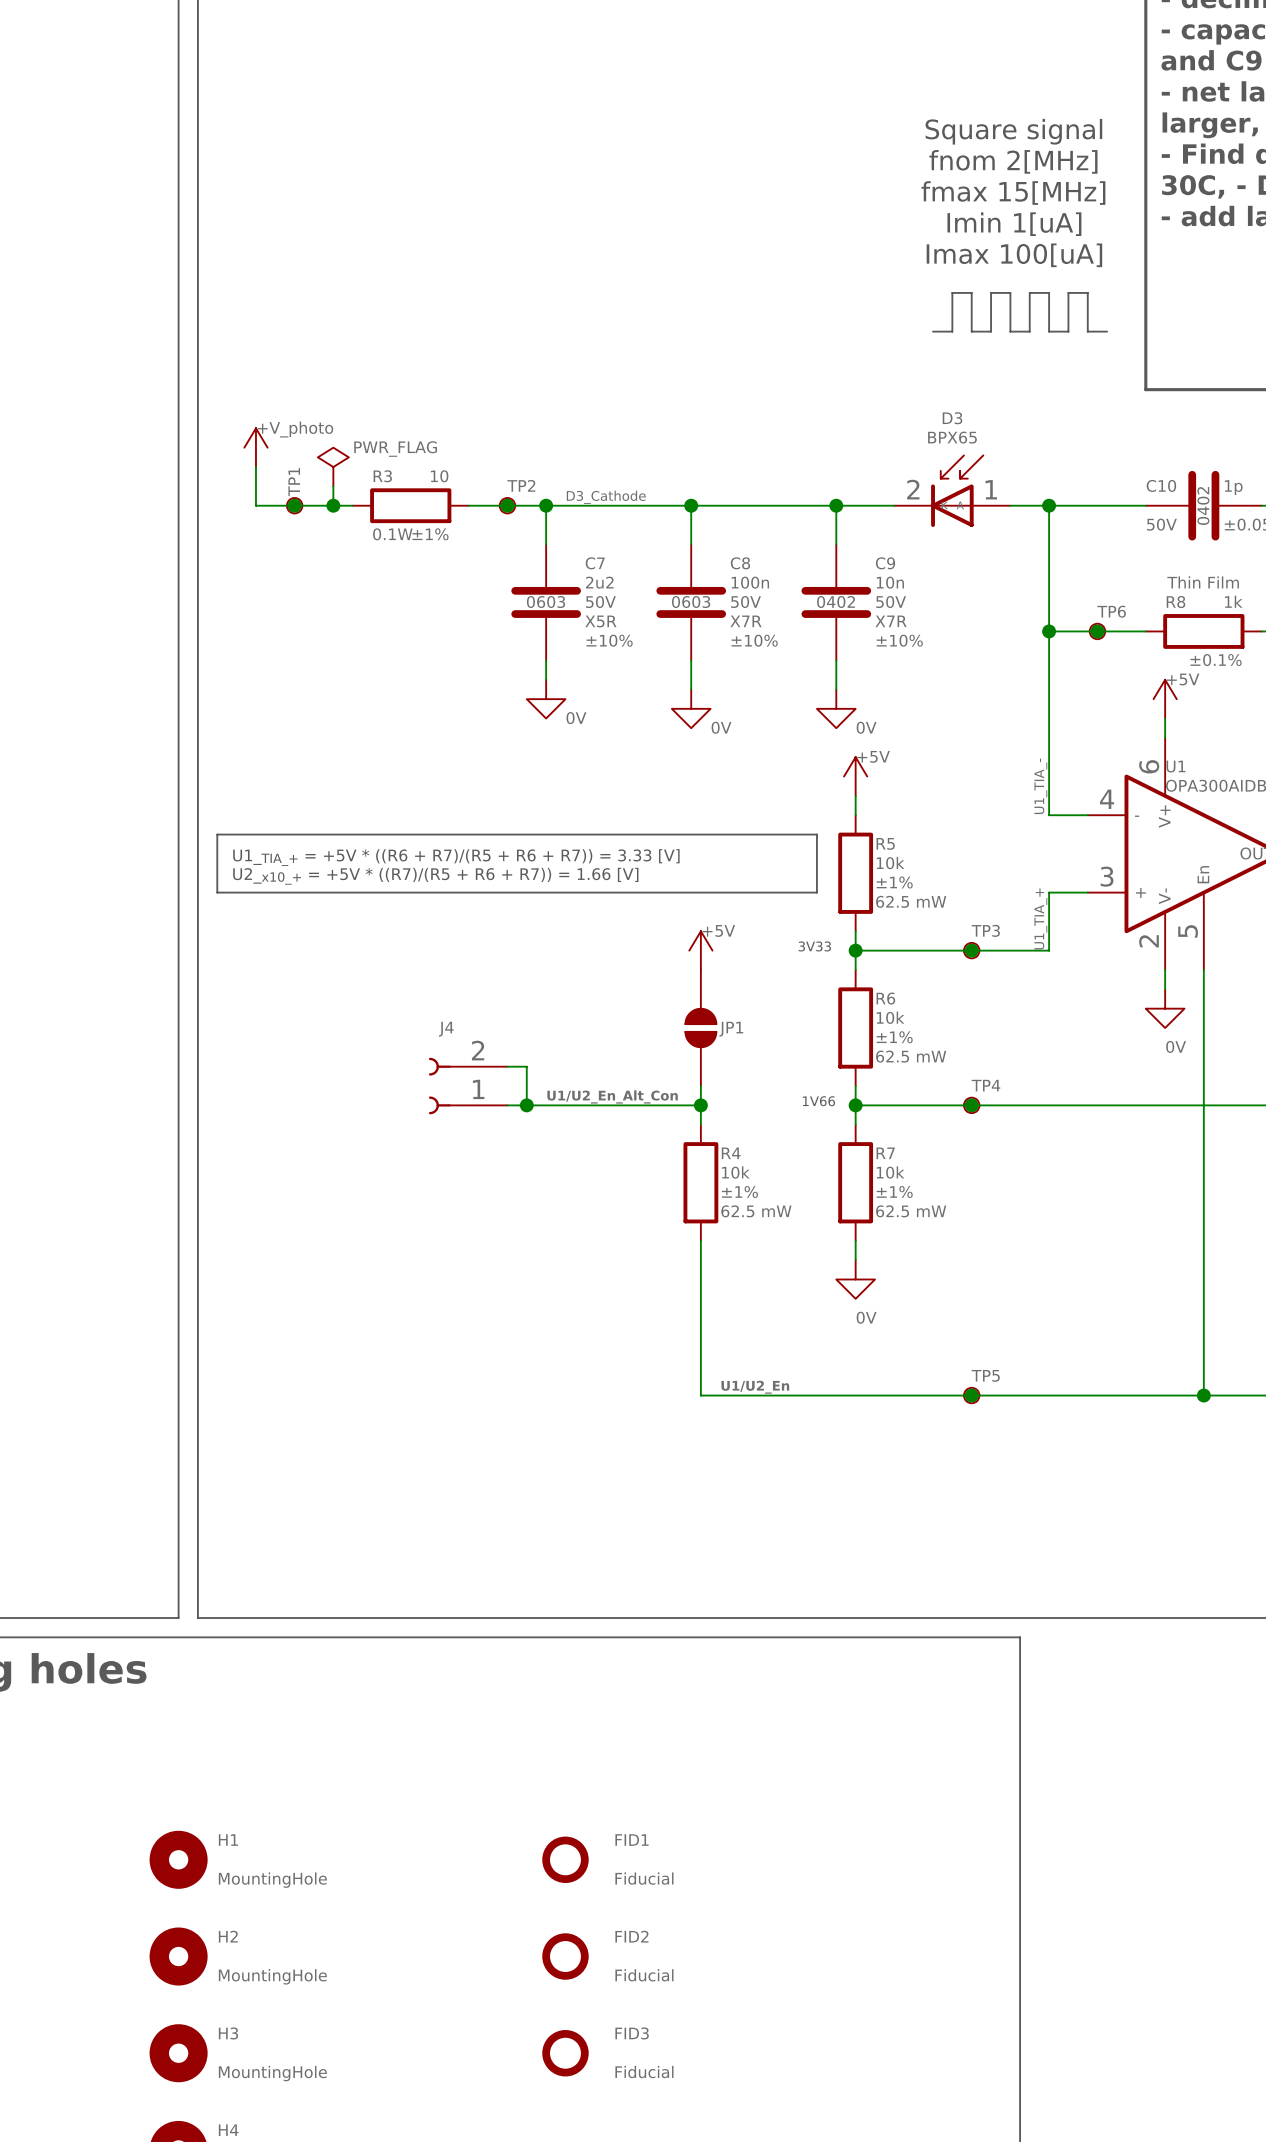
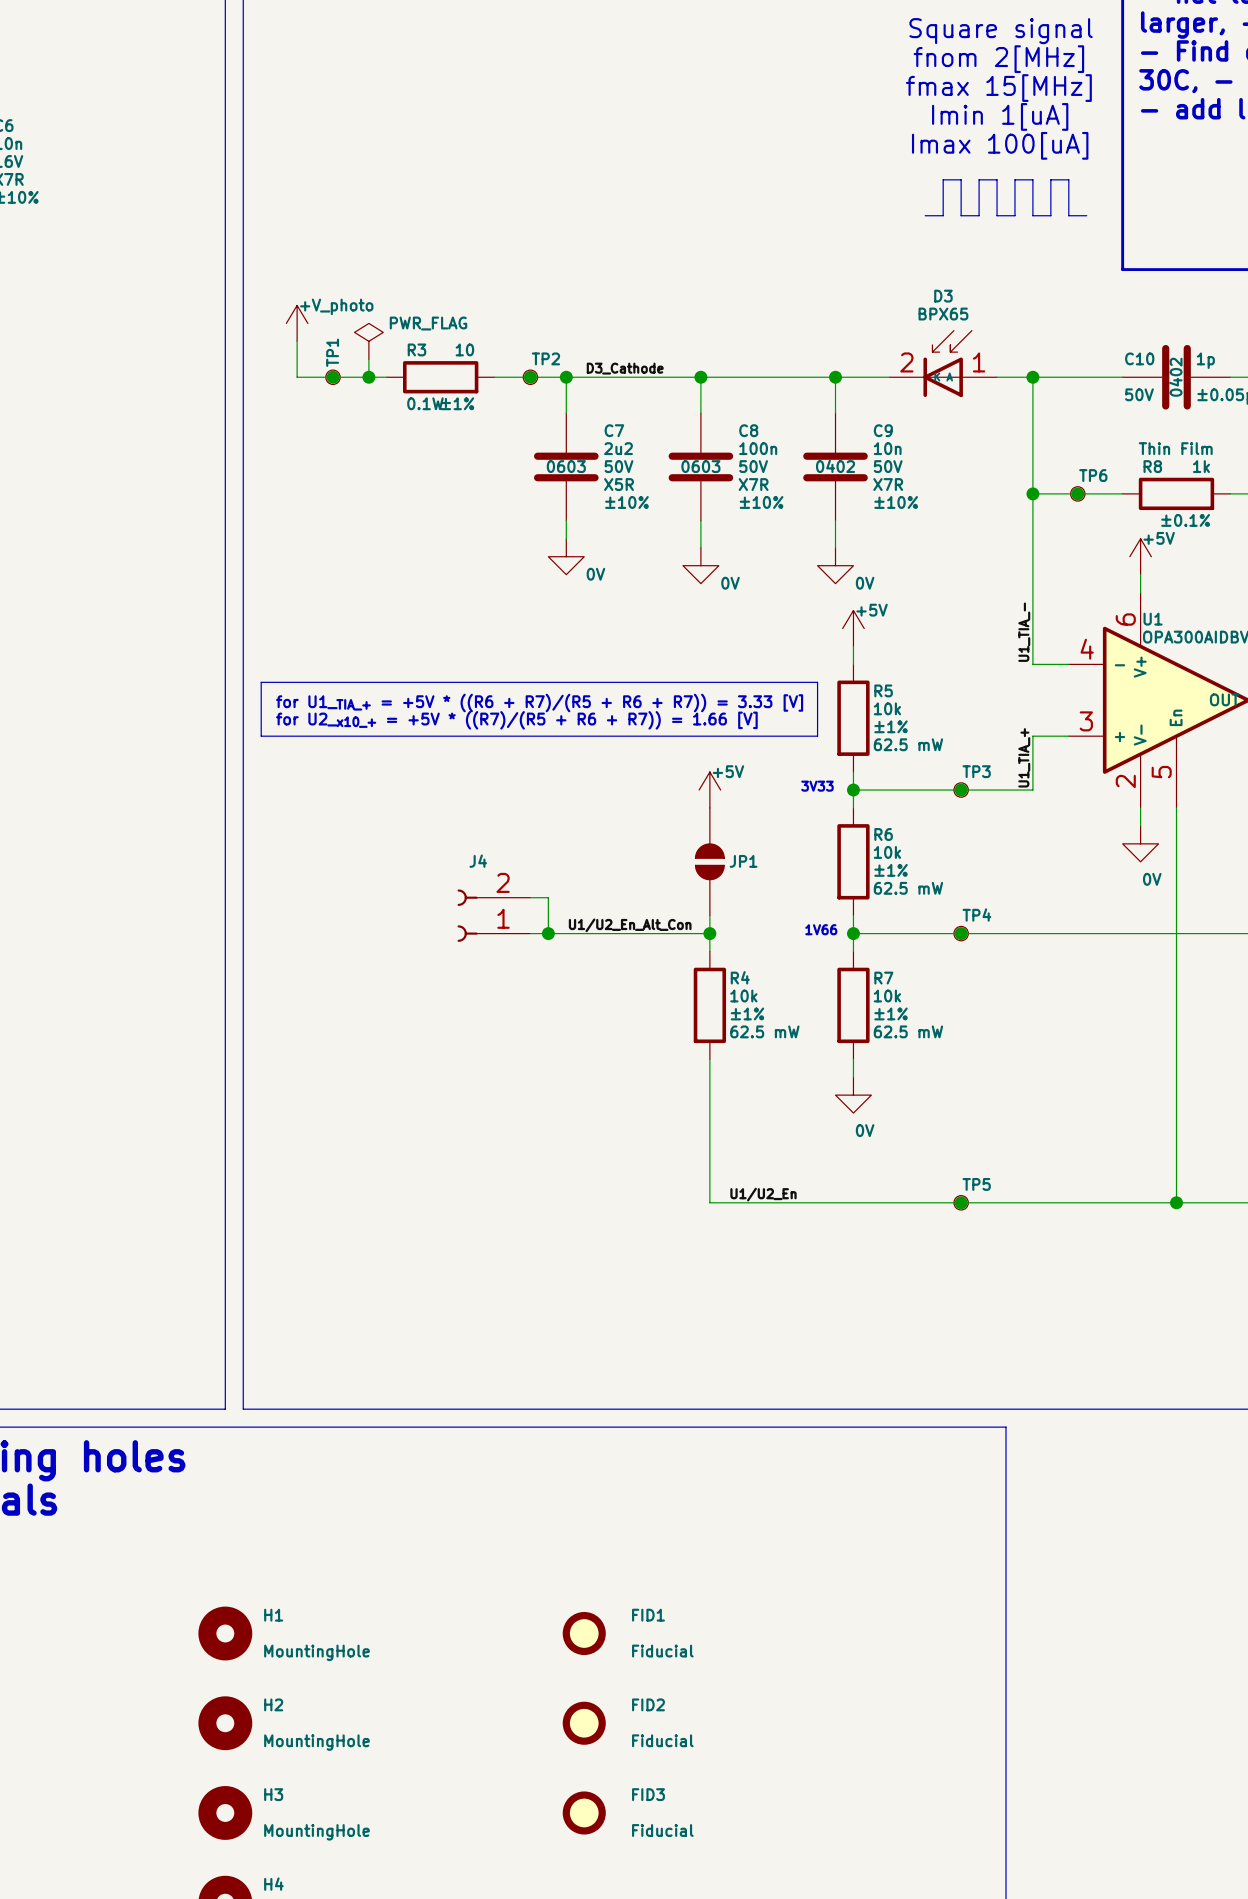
text: U1_TIA_+ = +5V * ((R6 + R7)/(R5 + R6 + R7)) = 3.33 [V] (456, 857) -> for U1_TIA_+ = +5V * ((R6 + R7)/(R5 + R6 + R7)) = 3.33 [V] (539, 702)
text: U2_x10_+ = +5V * ((R7)/(R5 + R6 + R7)) = 1.66 [V] (435, 876) -> for U2_x10_+ = +5V * ((R7)/(R5 + R6 + R7)) = 1.66 [V] (516, 720)

